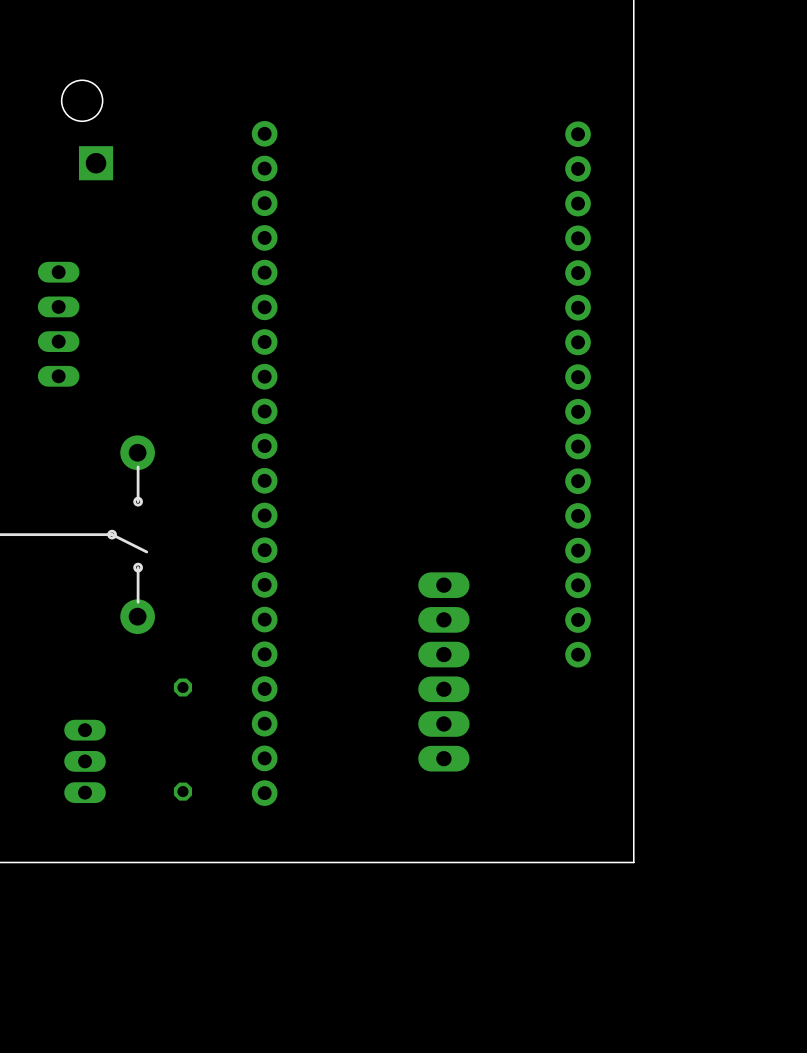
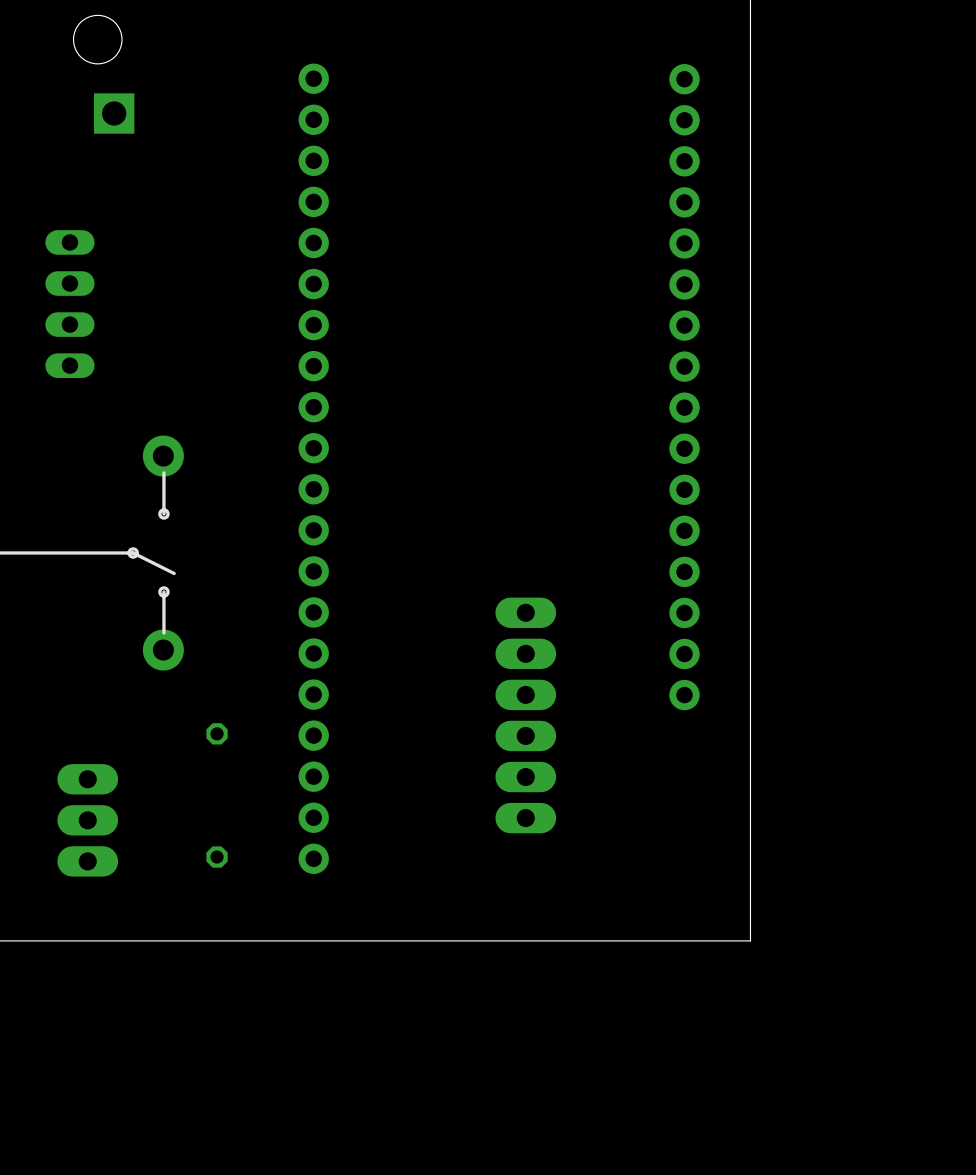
part footprint: [64, 719, 106, 804] -> [57, 764, 119, 877]

